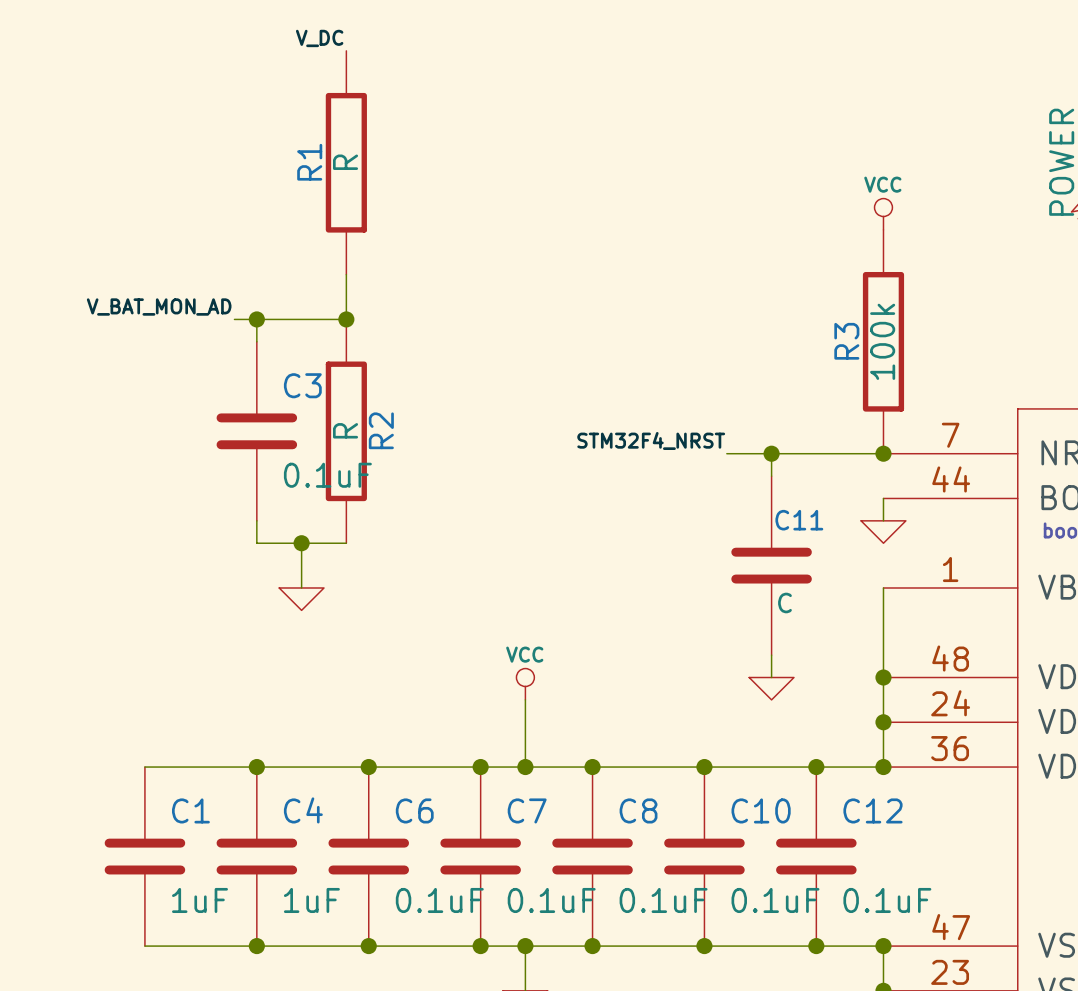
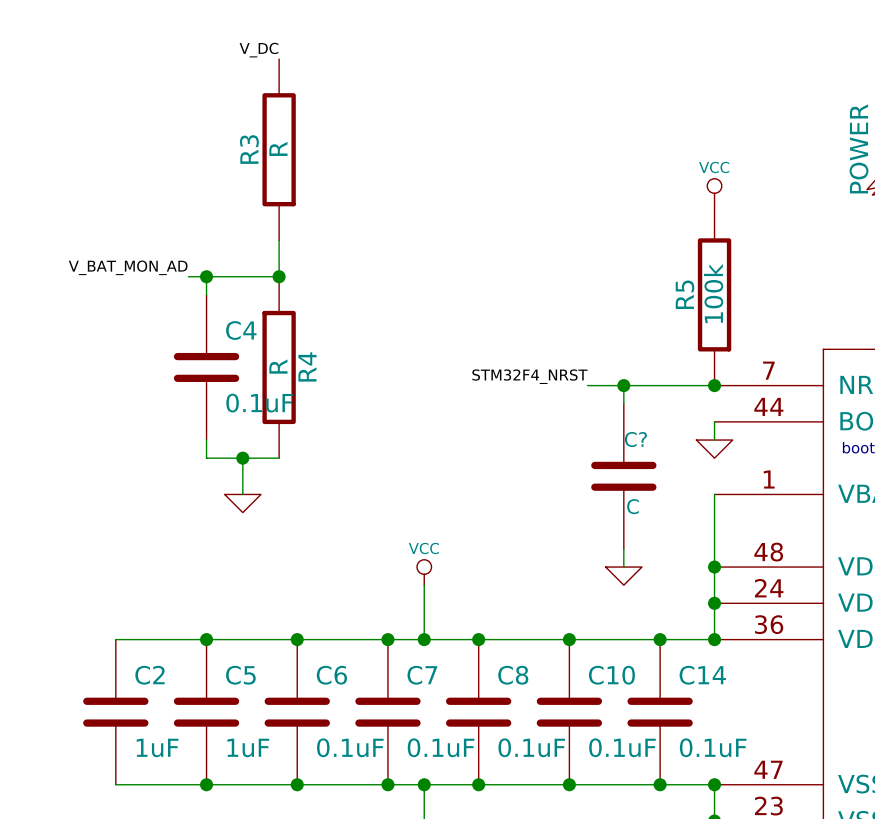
R1 name: R1 (309, 162) -> R3 (249, 149)
R3 name: R3 (846, 341) -> R5 (685, 294)
C3 name: C3 (302, 385) -> C4 (241, 330)
R2 name: R2 (381, 430) -> R4 (307, 366)
C11 name: C11 (799, 520) -> C? (635, 439)
C1 name: C1 (190, 810) -> C2 (150, 675)
C4 name: C4 (303, 810) -> C5 (240, 675)
C12 name: C12 (872, 810) -> C14 (702, 675)

